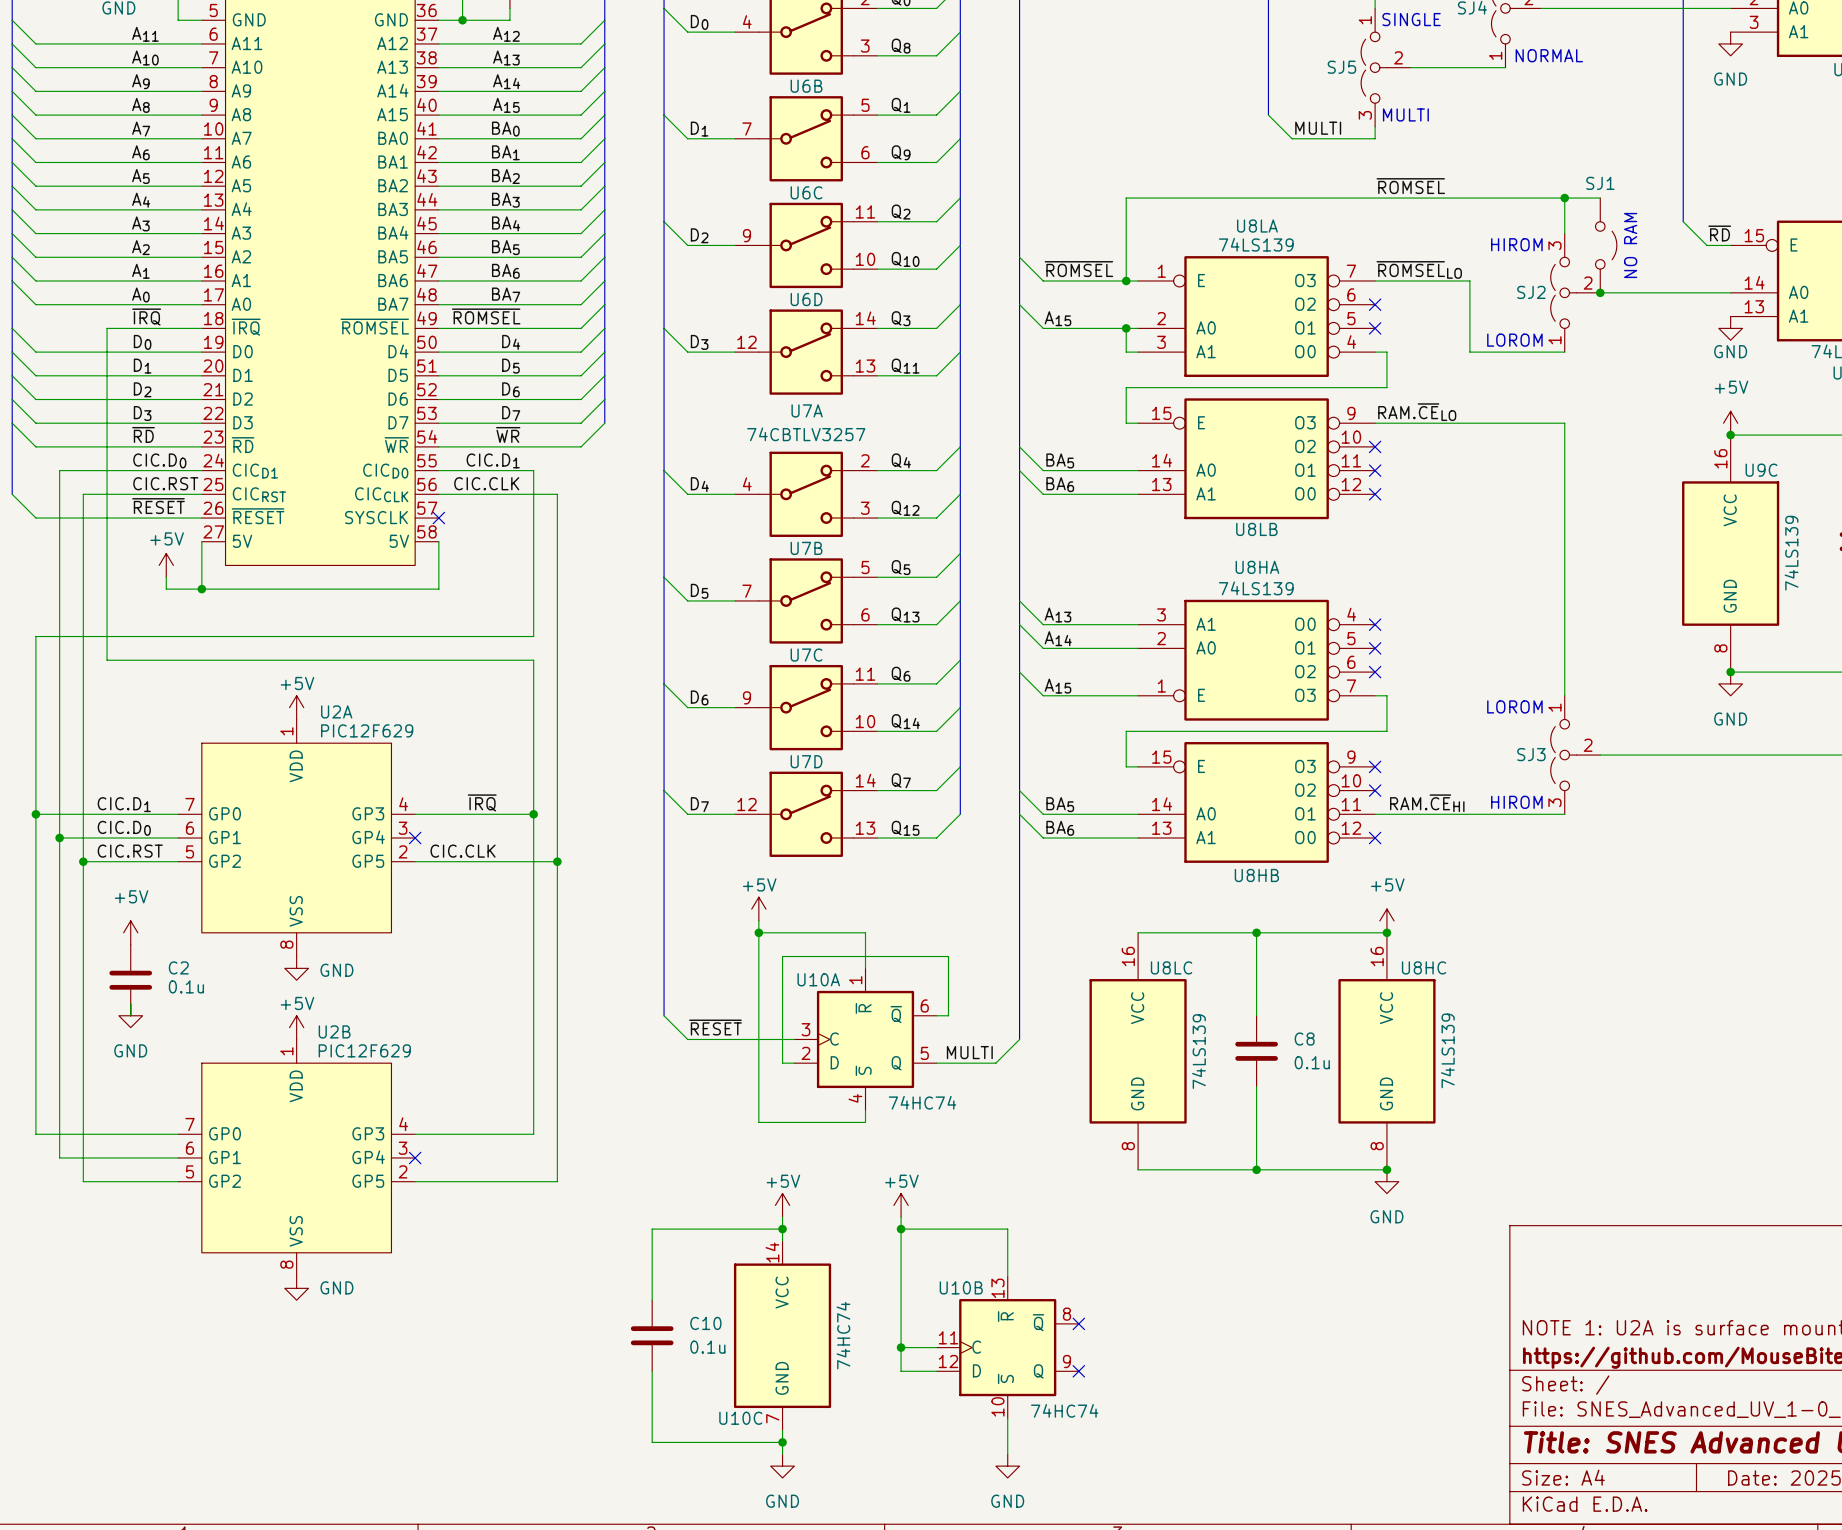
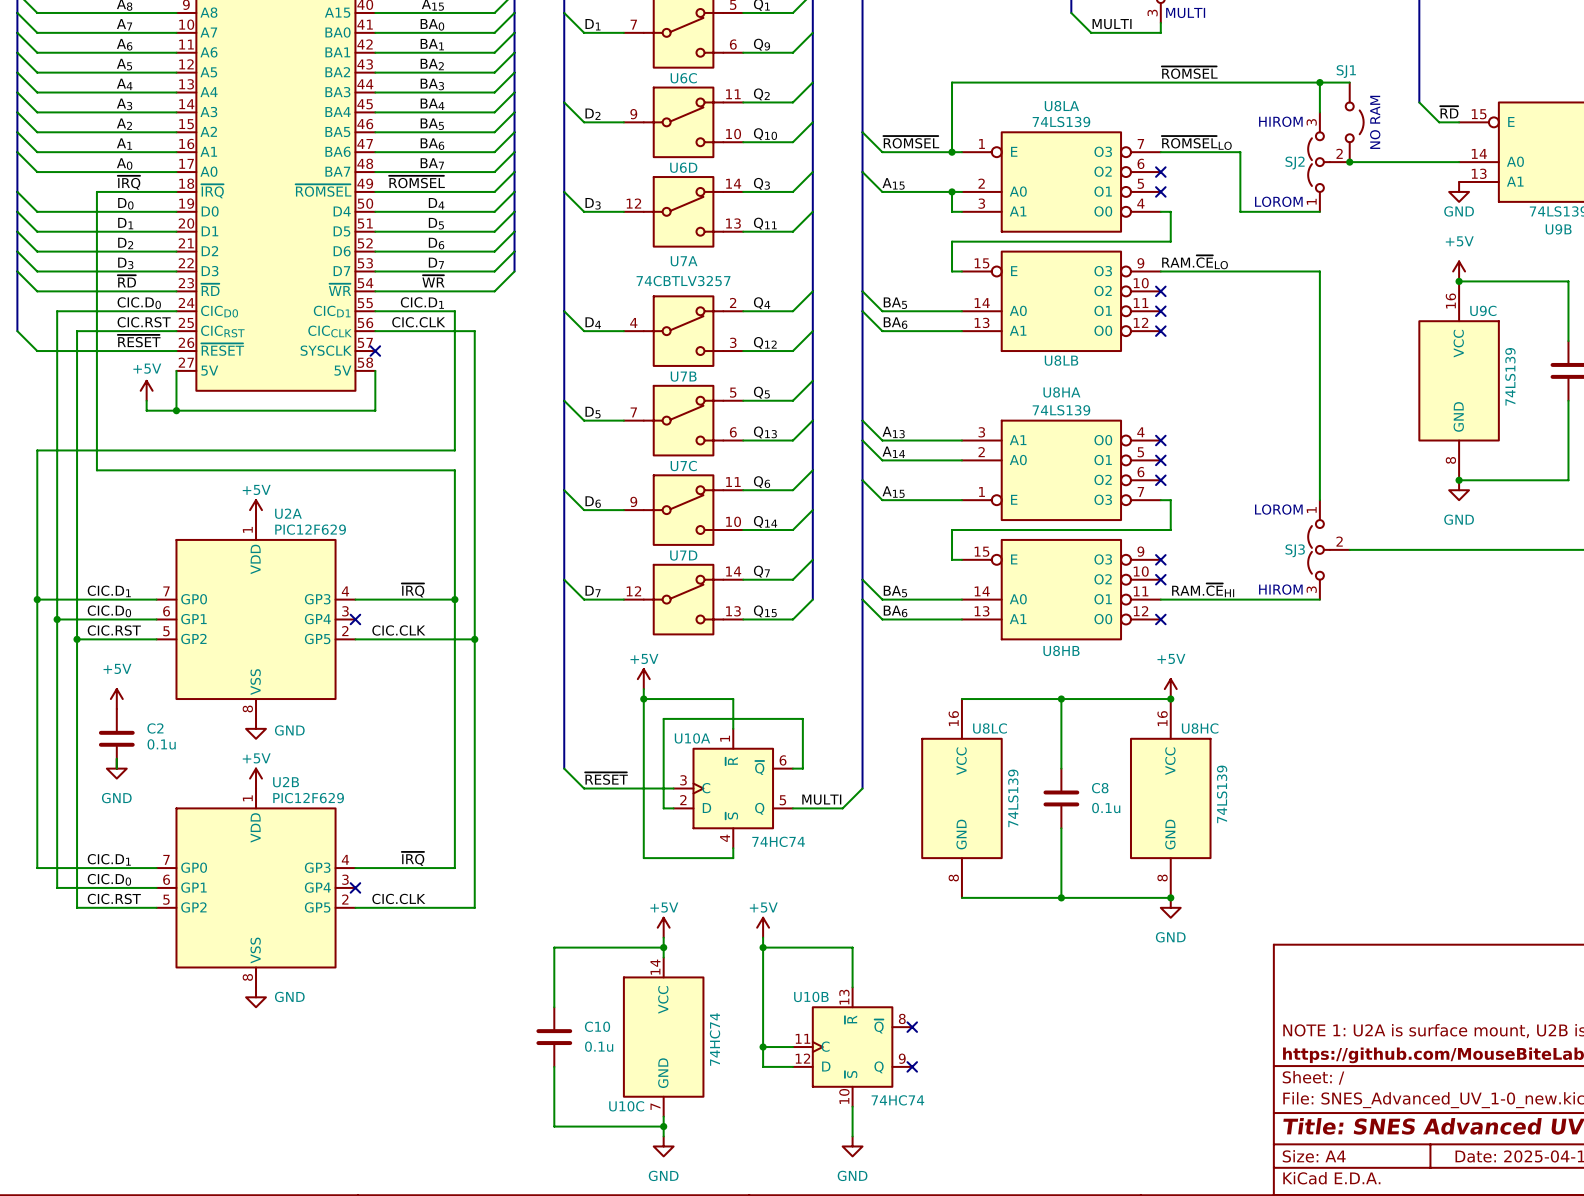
part pin name: CICD1 (255, 471) -> CICD0 (219, 311)
part pin name: CICD0 (385, 471) -> CICD1 (332, 311)
label: none -> ~{IRQ} (413, 858)
label: none -> CIC.D1 (109, 859)
label: none -> CIC.D0 (109, 879)
label: none -> CIC.RST (114, 898)
label: none -> CIC.CLK (398, 898)

